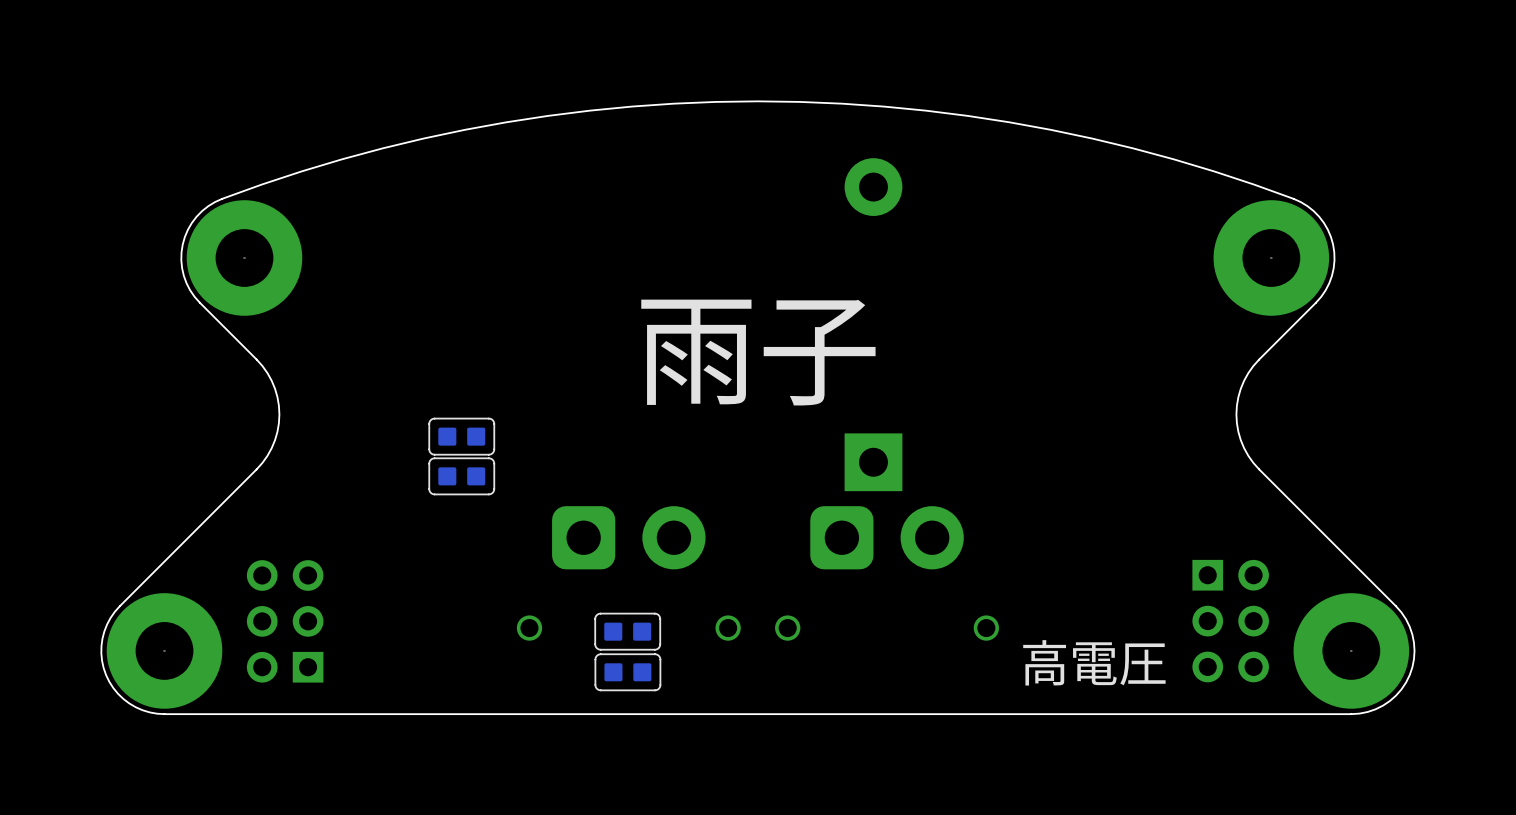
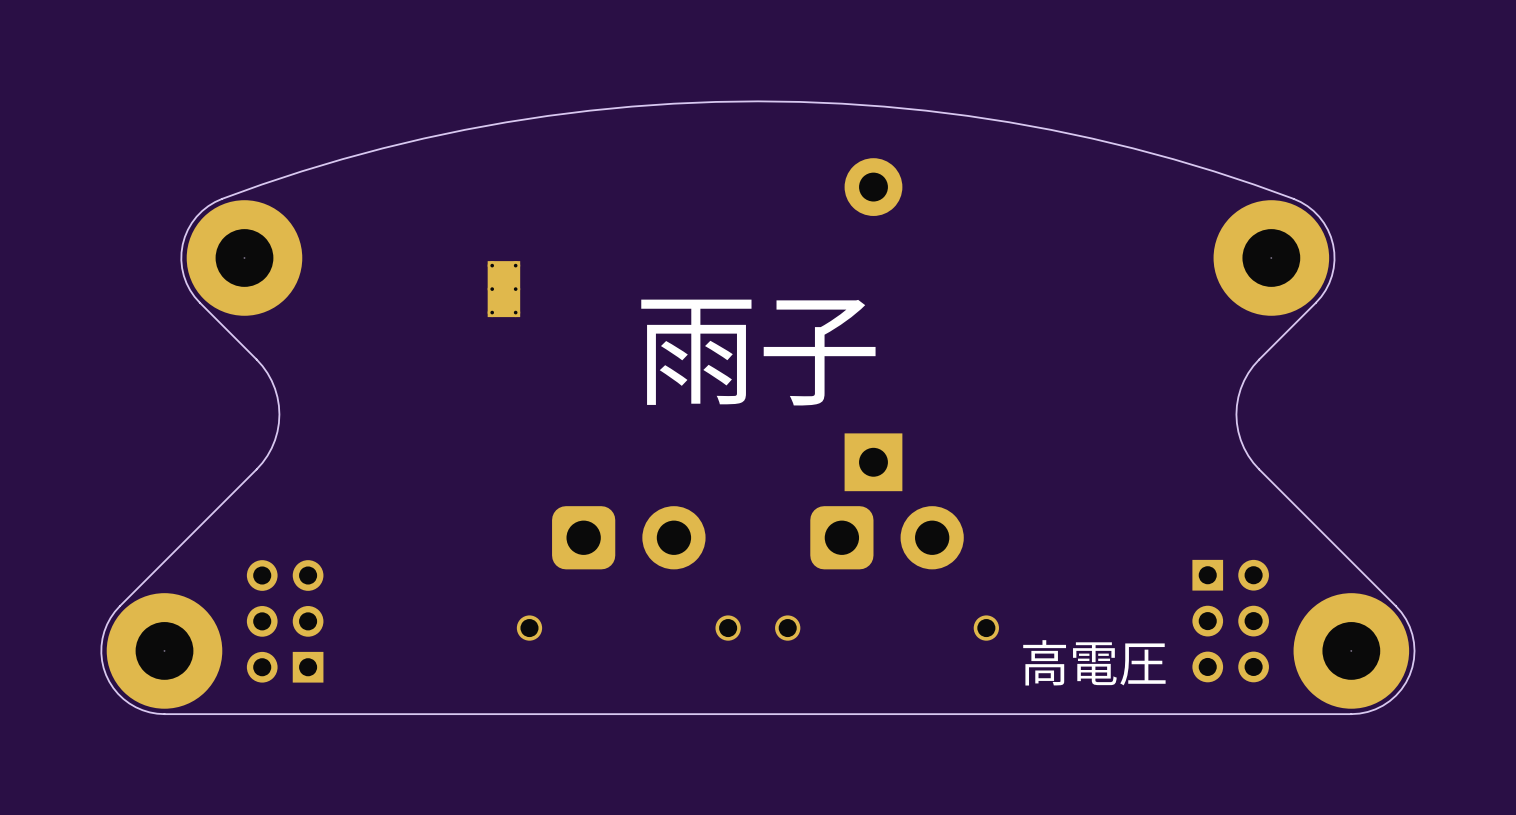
part: none -> (503, 289)
part: (461, 436) -> none
part: (461, 476) -> none
part: (627, 631) -> none
part: (627, 672) -> none

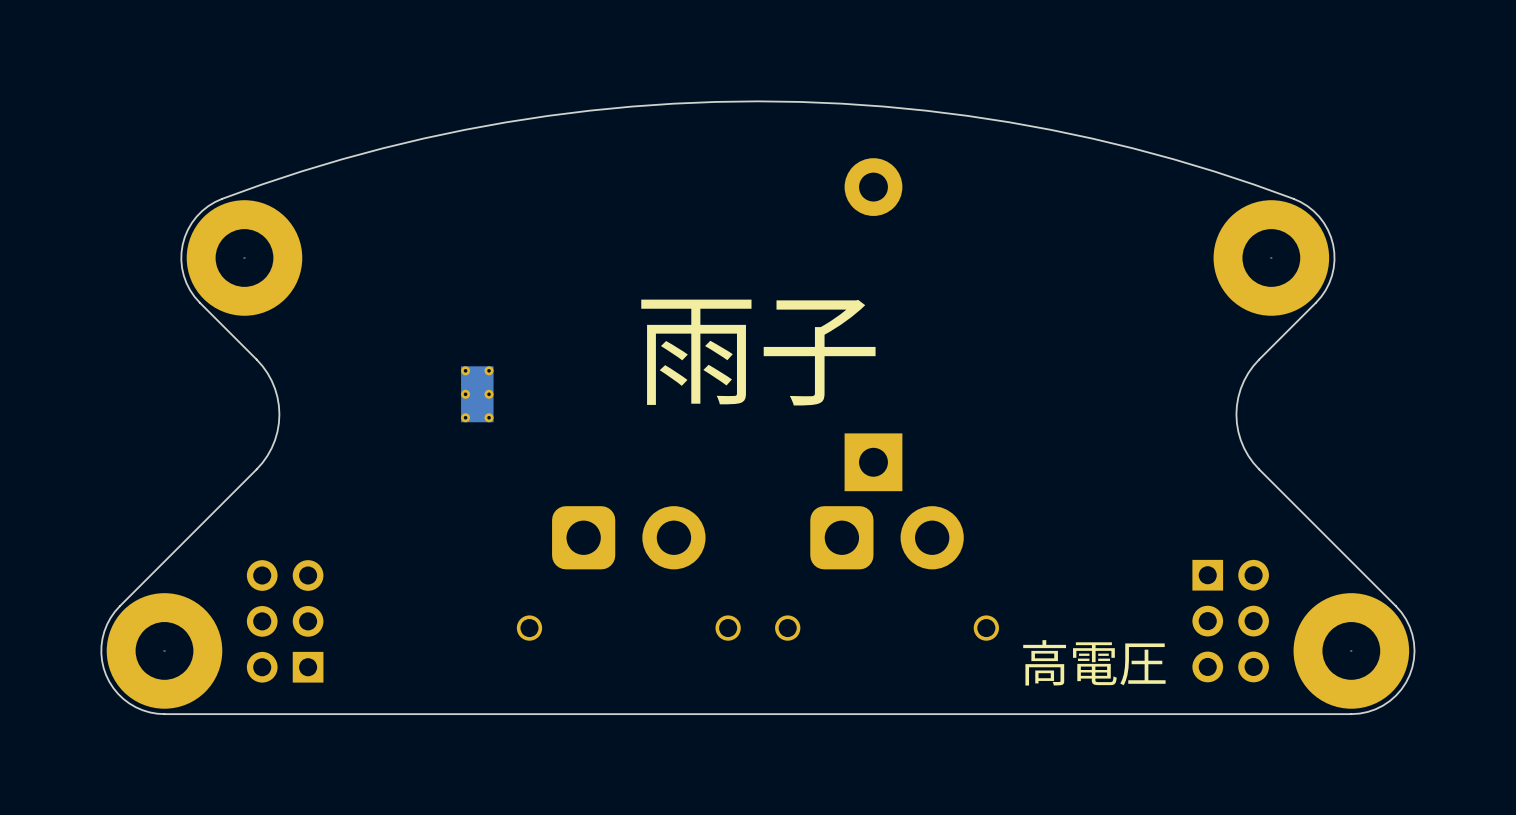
part position: (503, 289) -> (477, 394)

